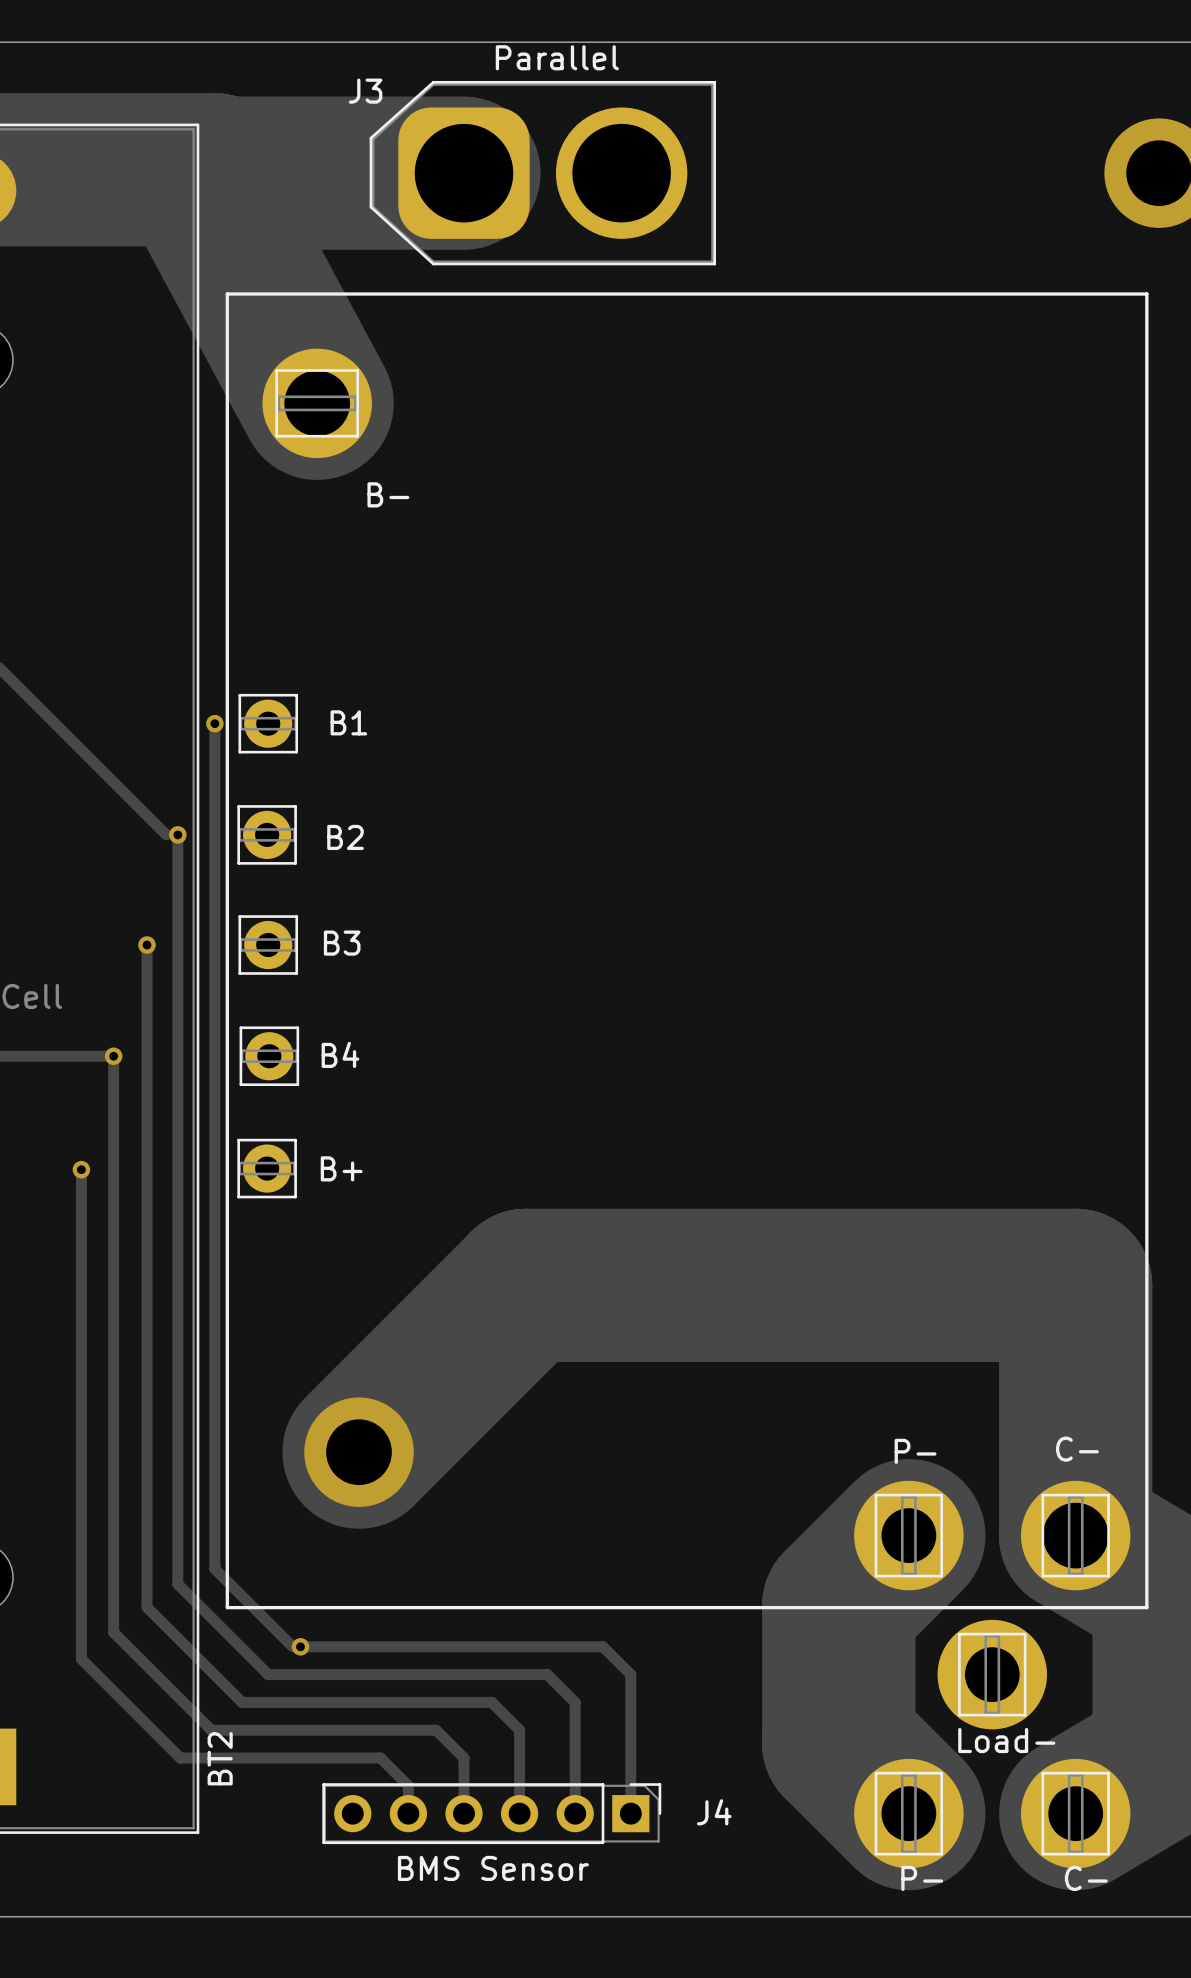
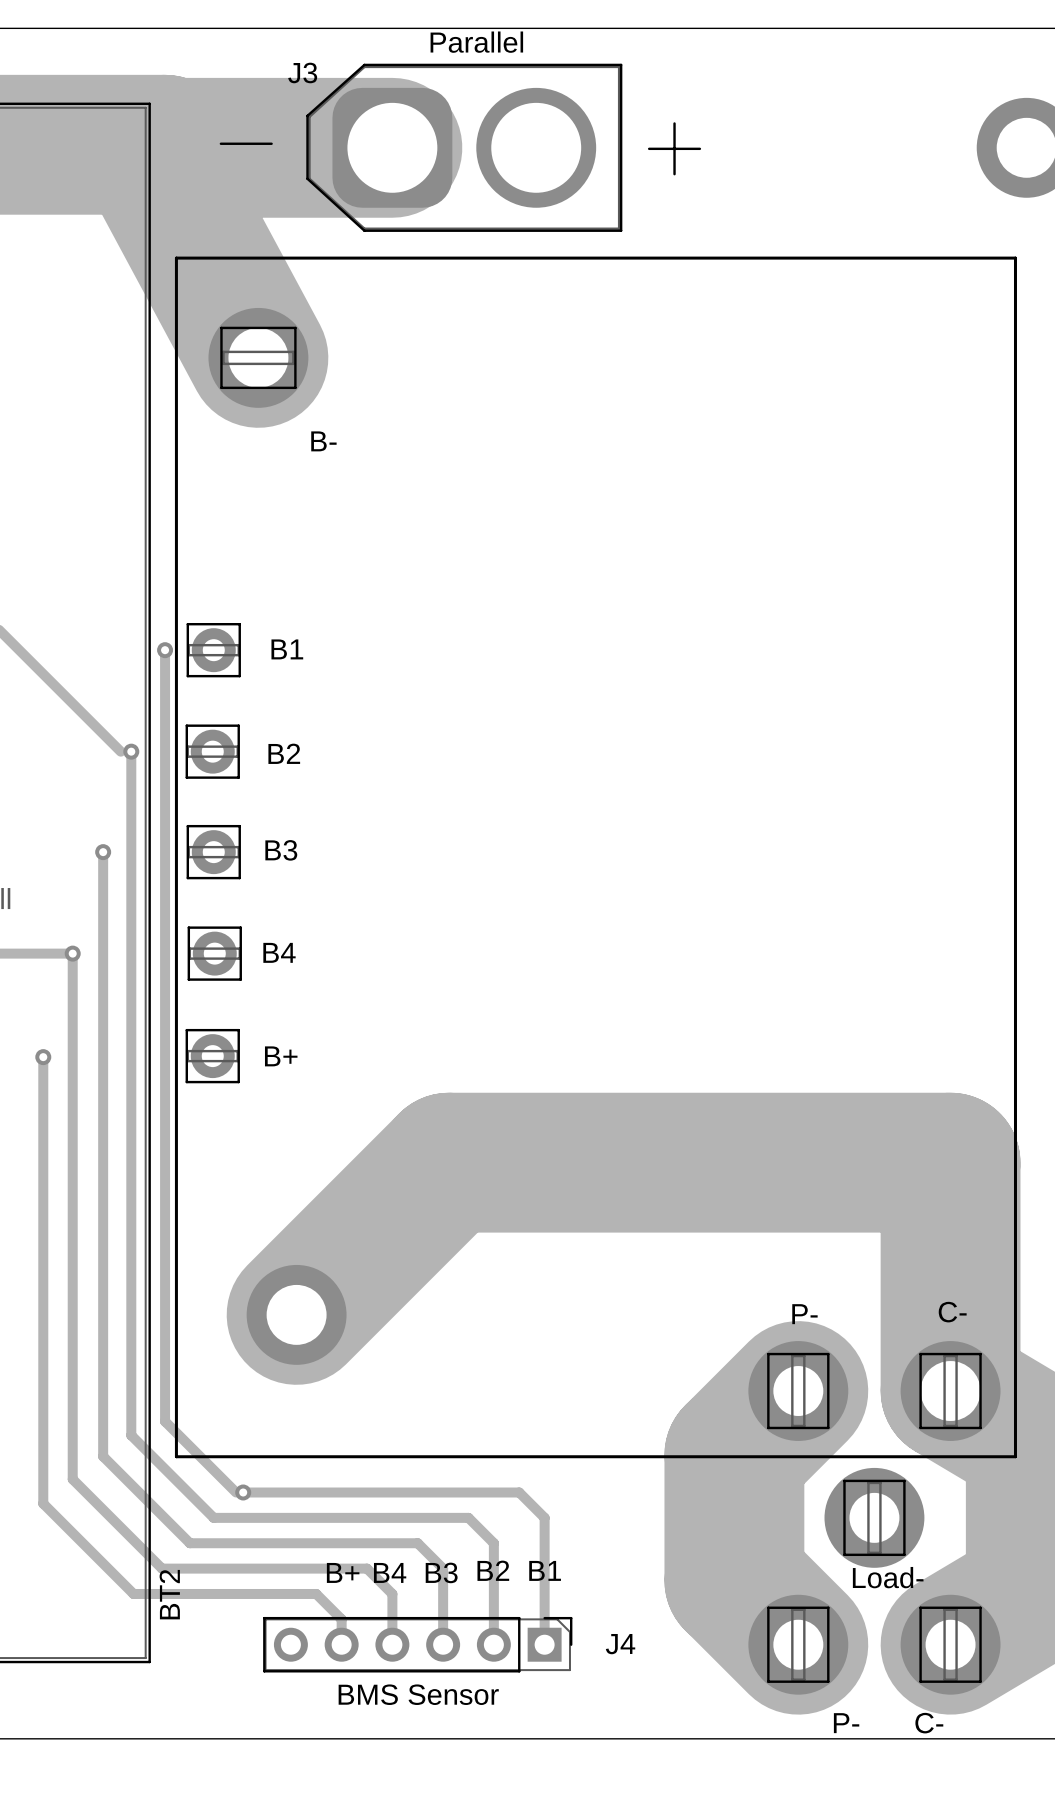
line: none -> (674, 123) (674, 174)
line: none -> (220, 143) (271, 143)
line: none -> (649, 148) (699, 148)
text: none -> B2 (493, 1570)
text: none -> B1 (545, 1570)
text: none -> B+ (343, 1572)
text: none -> B4 (390, 1572)
text: none -> B3 (441, 1572)
part value position: P- (922, 1878) -> P- (846, 1723)
part value position: C- (1086, 1878) -> C- (929, 1723)

